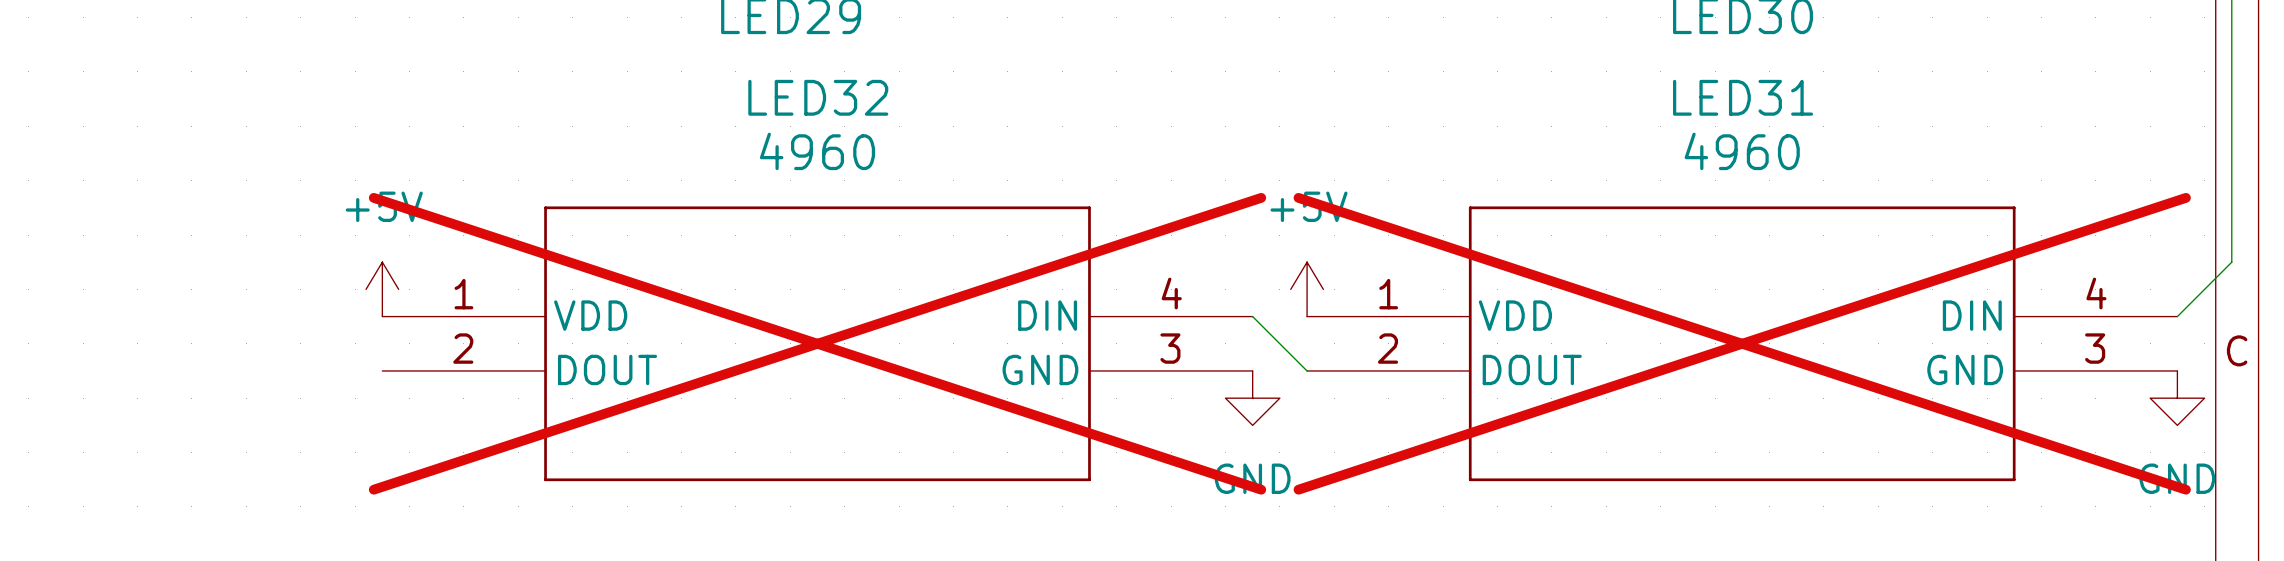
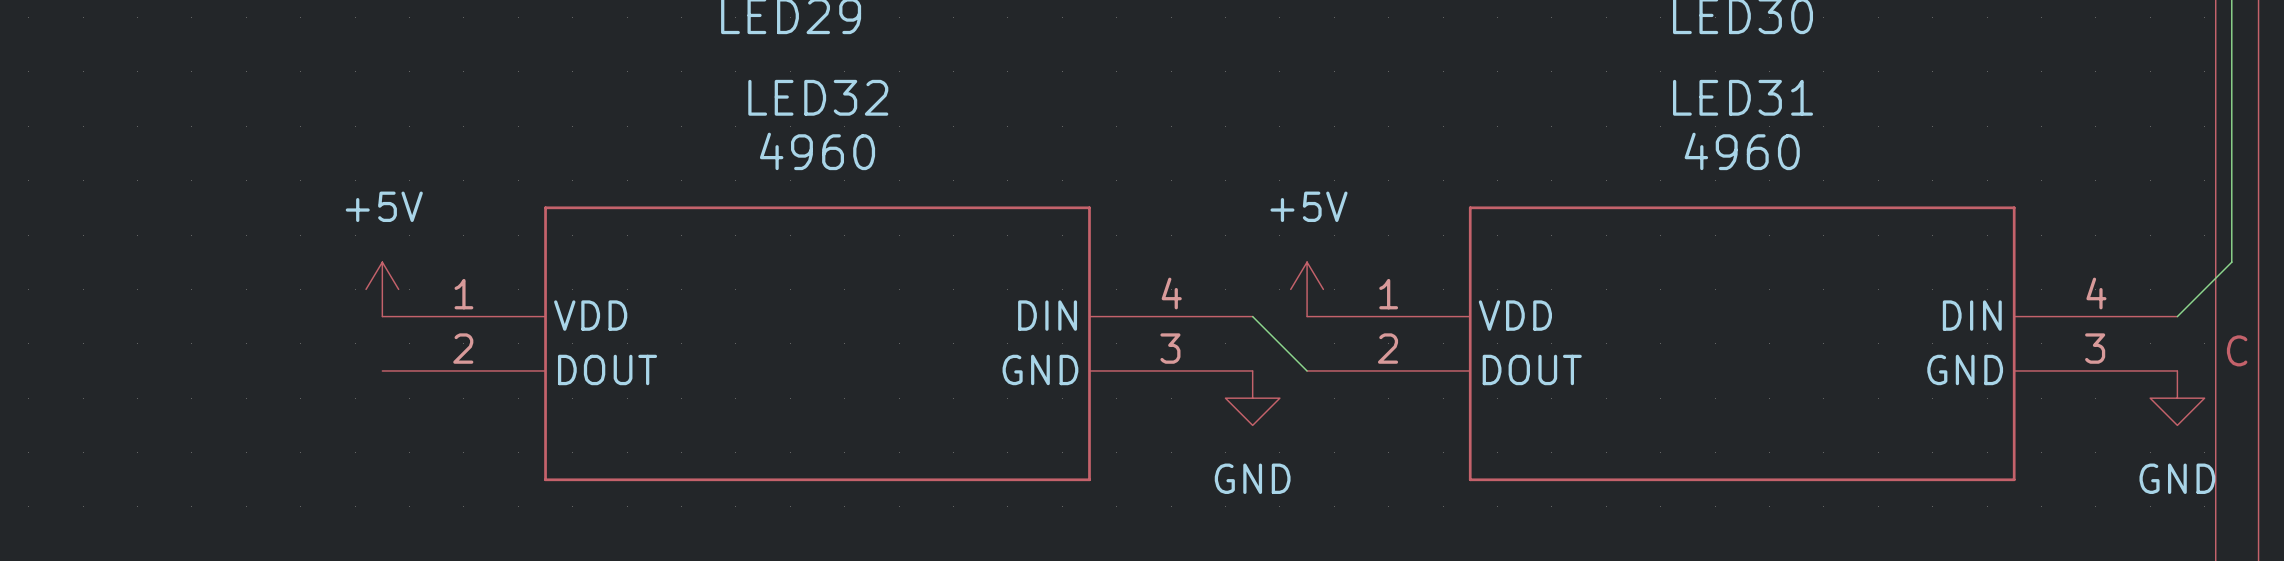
LED32 do-not-place cross: (817, 343) -> none
LED31 do-not-place cross: (1742, 343) -> none

